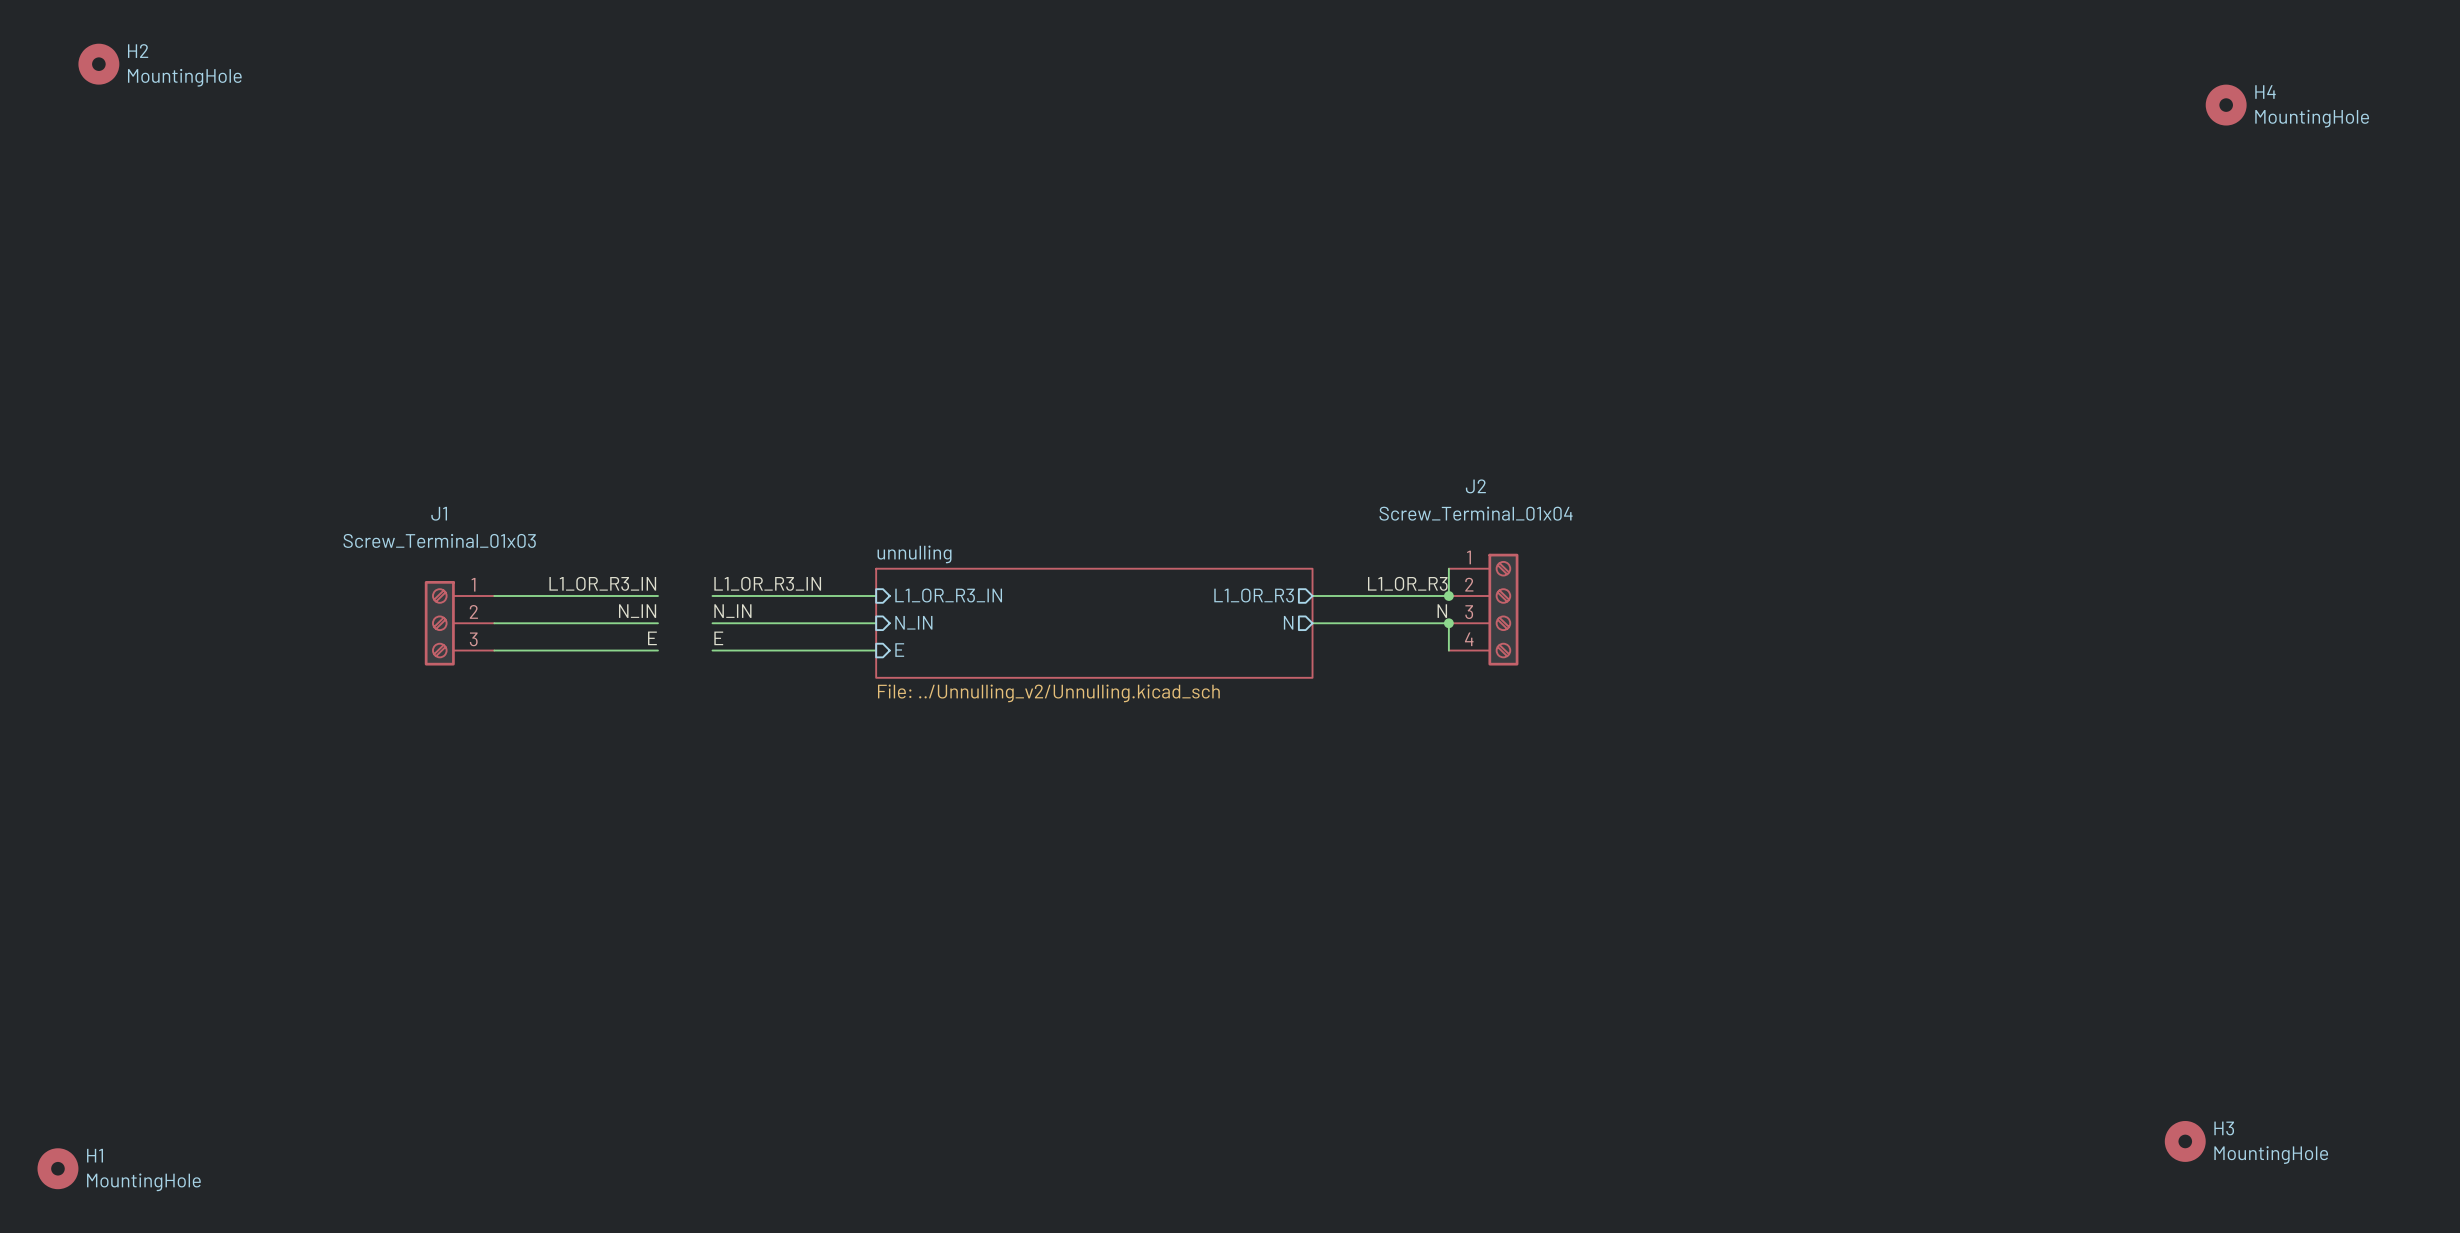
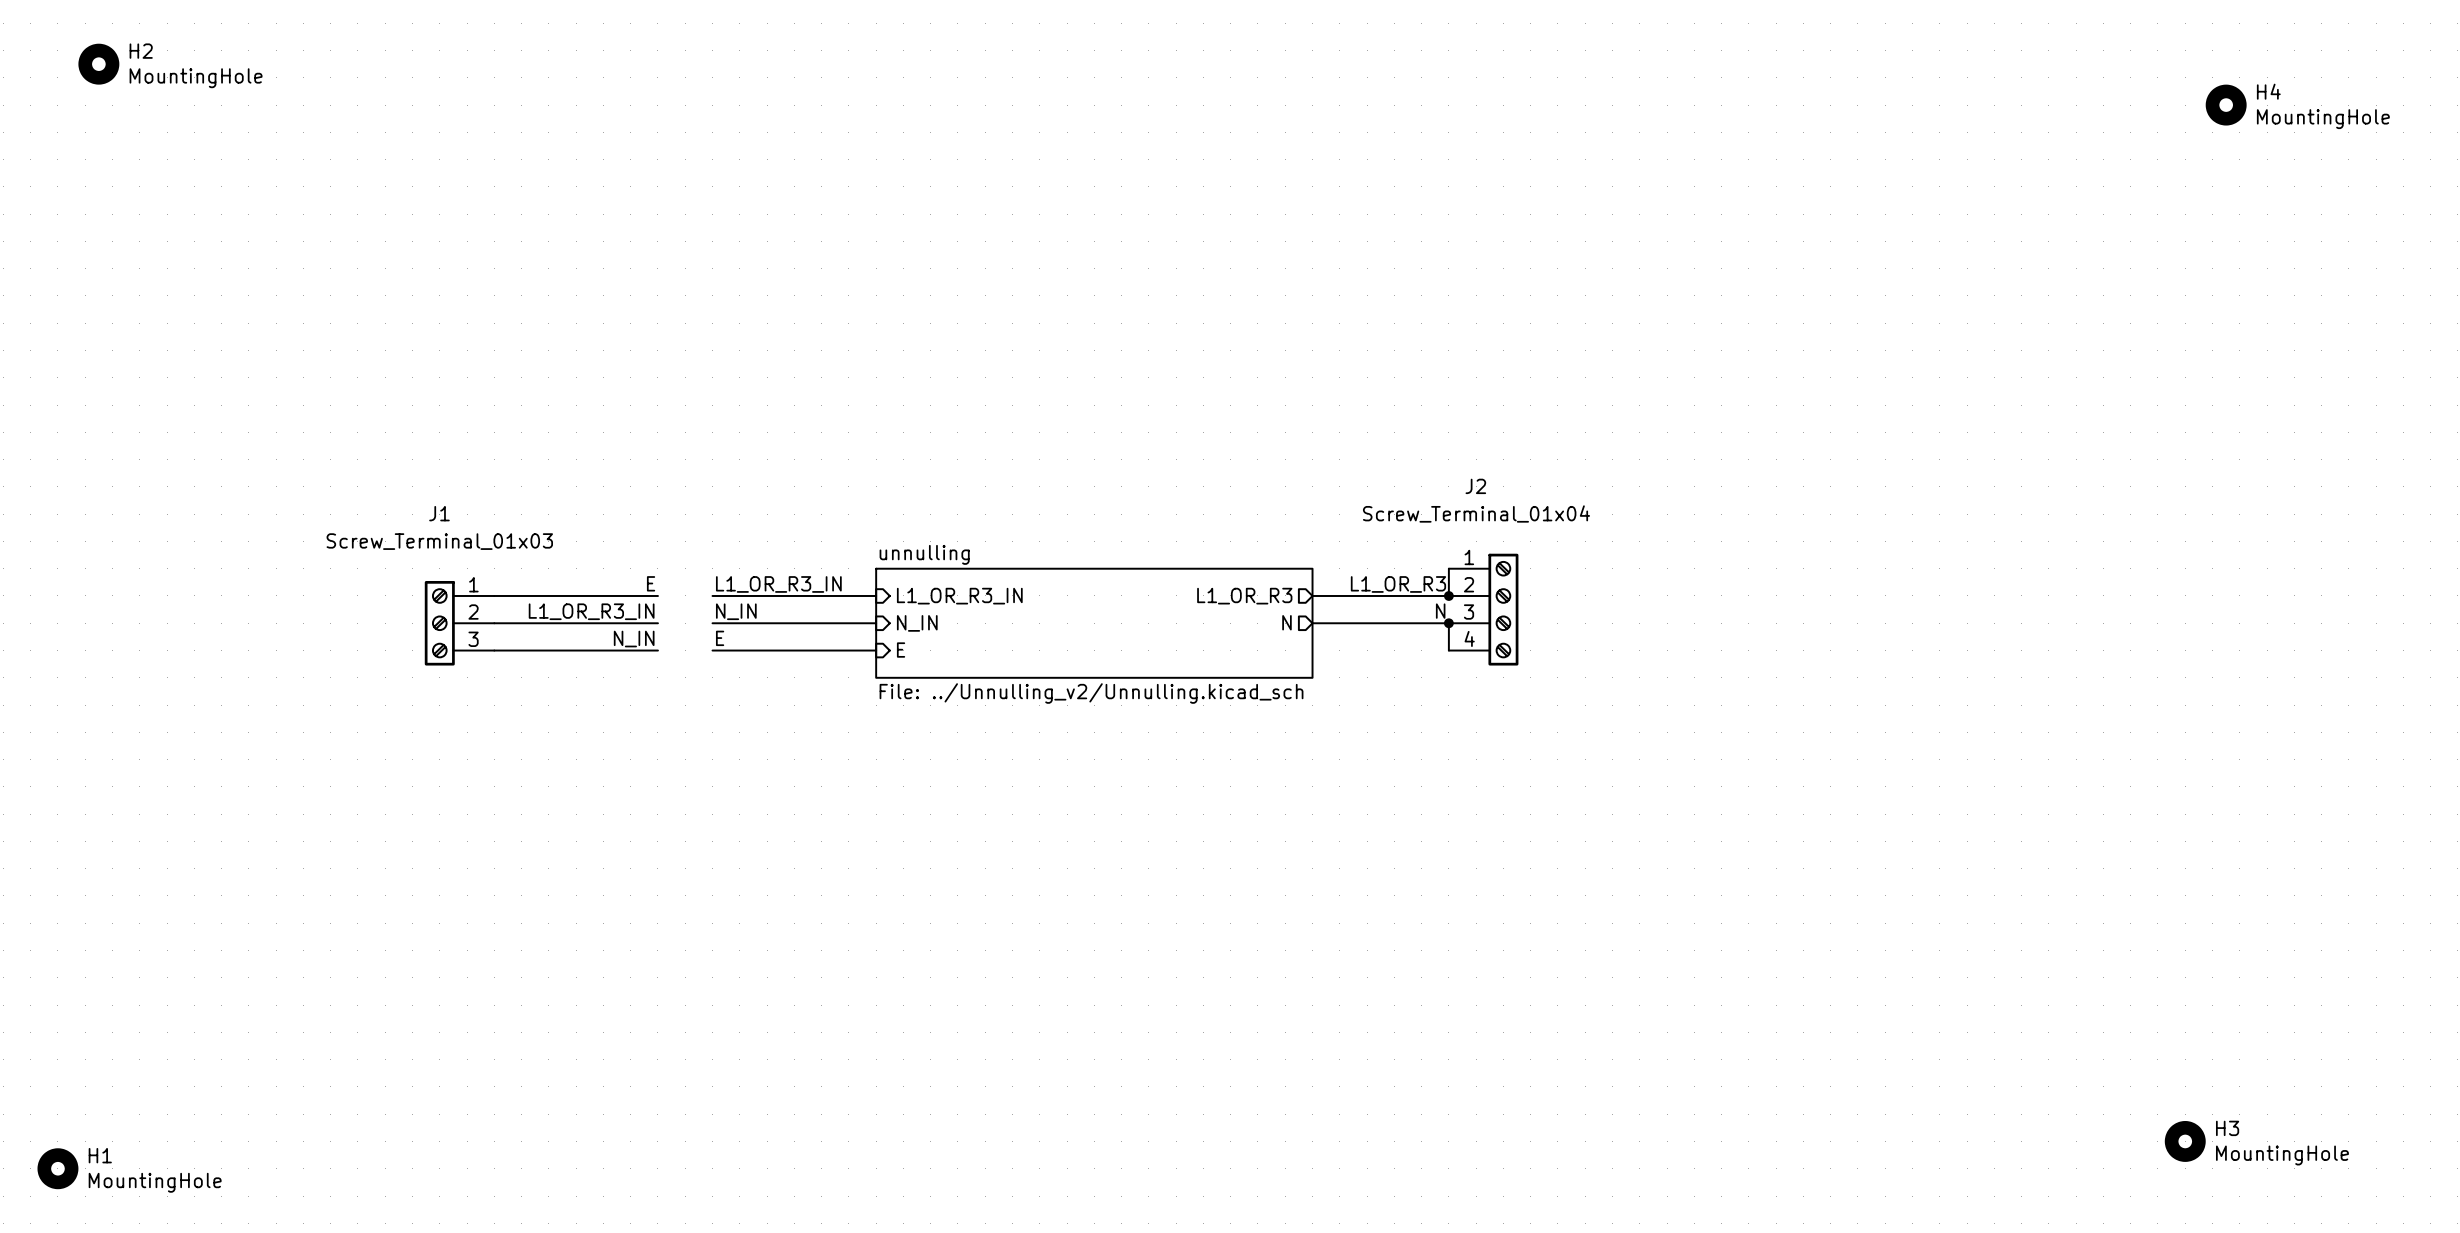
label: L1_OR_R3_IN (602, 583) -> E (651, 583)
label: N_IN (637, 611) -> L1_OR_R3_IN (591, 611)
label: E (652, 638) -> N_IN (634, 639)

